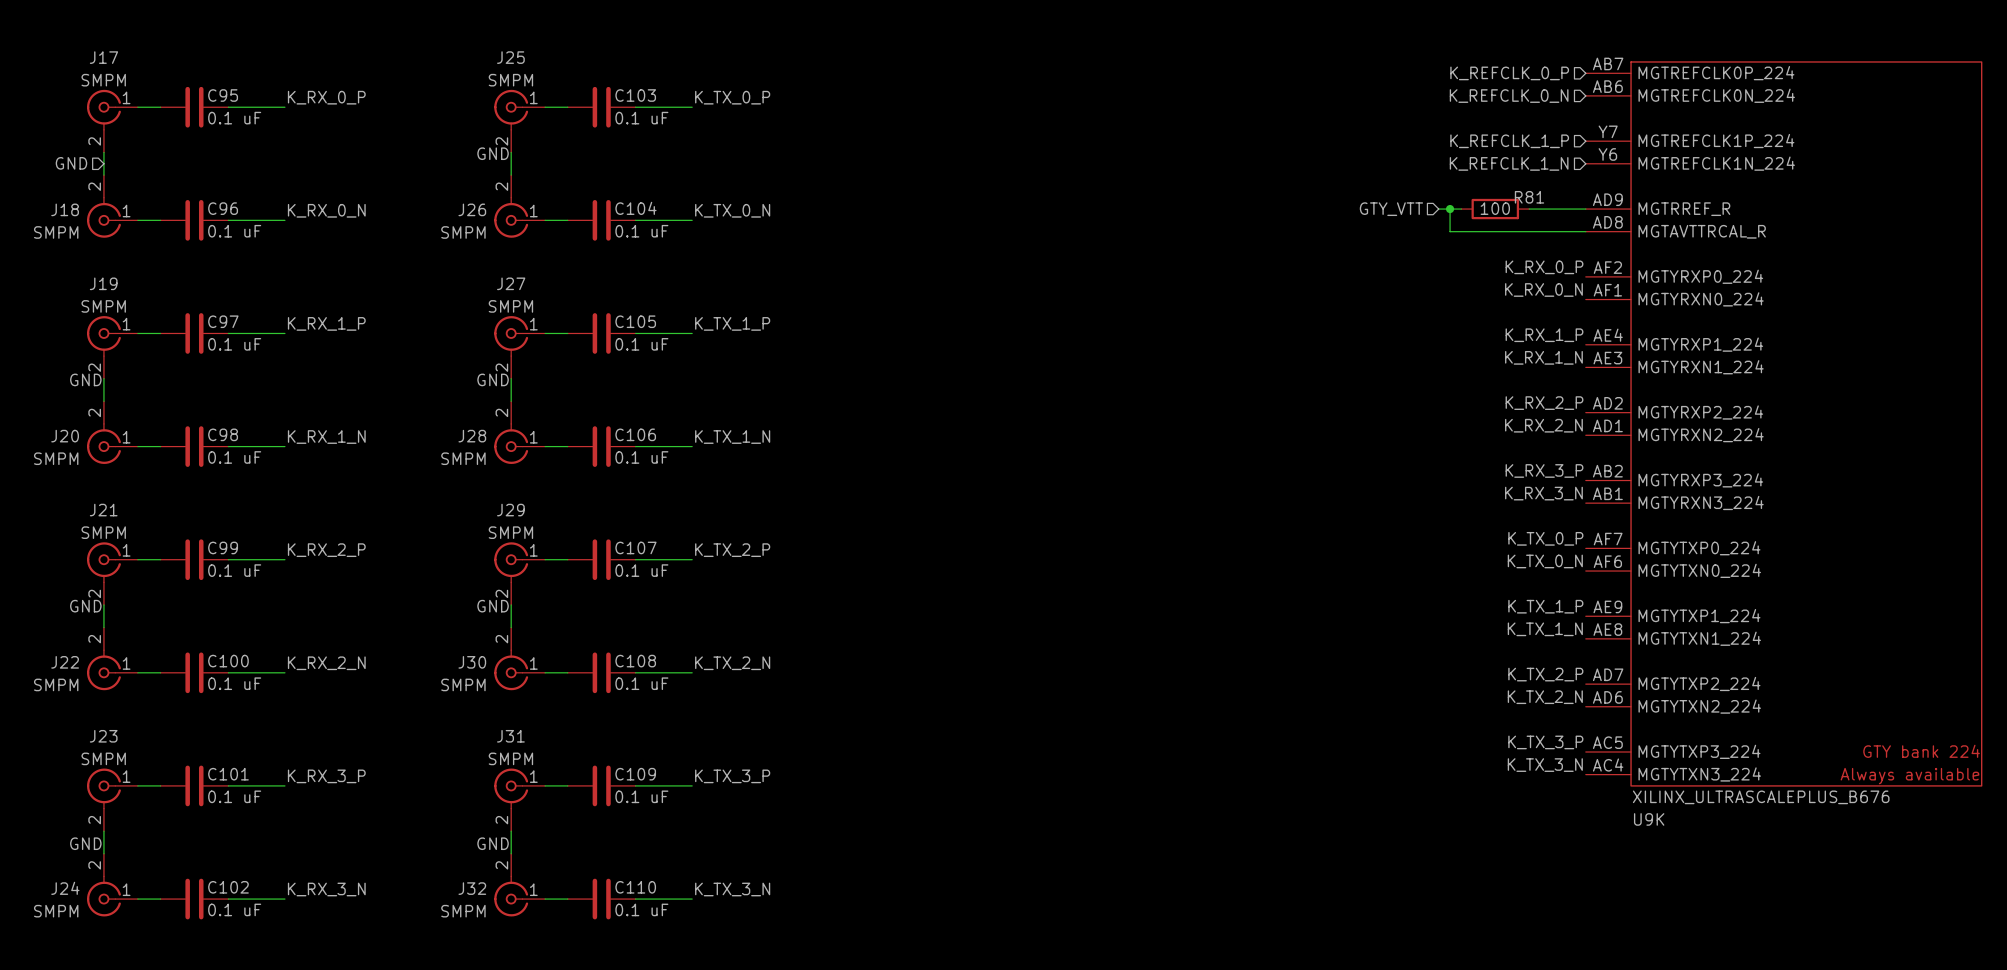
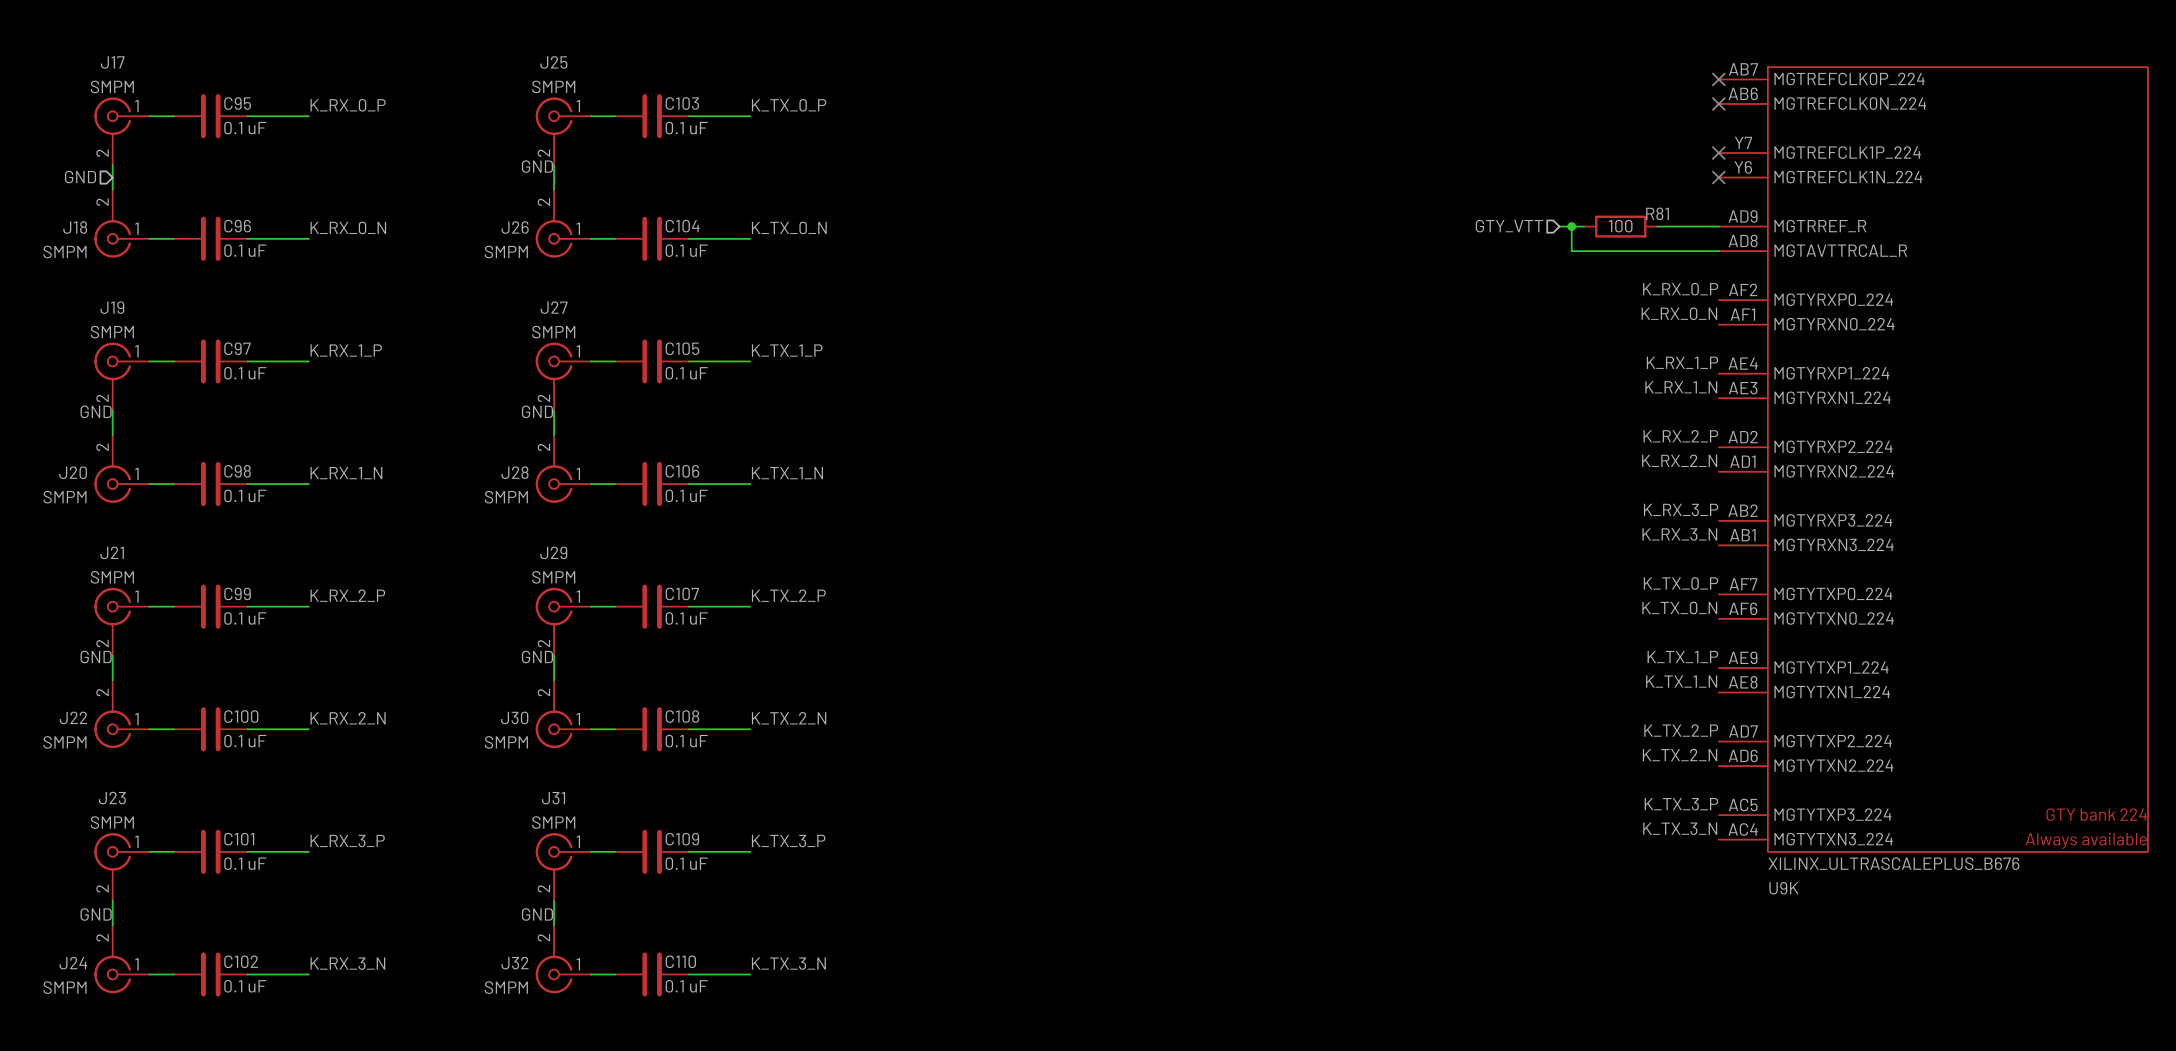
hierarchical label: K_REFCLK_0_P (1509, 73) -> none
no-connect mark: none -> (1718, 79)
no-connect mark: none -> (1718, 103)
hierarchical label: K_REFCLK_0_N (1509, 96) -> none
hierarchical label: K_REFCLK_1_P (1509, 141) -> none
no-connect mark: none -> (1718, 153)
hierarchical label: K_REFCLK_1_N (1509, 163) -> none
no-connect mark: none -> (1718, 177)

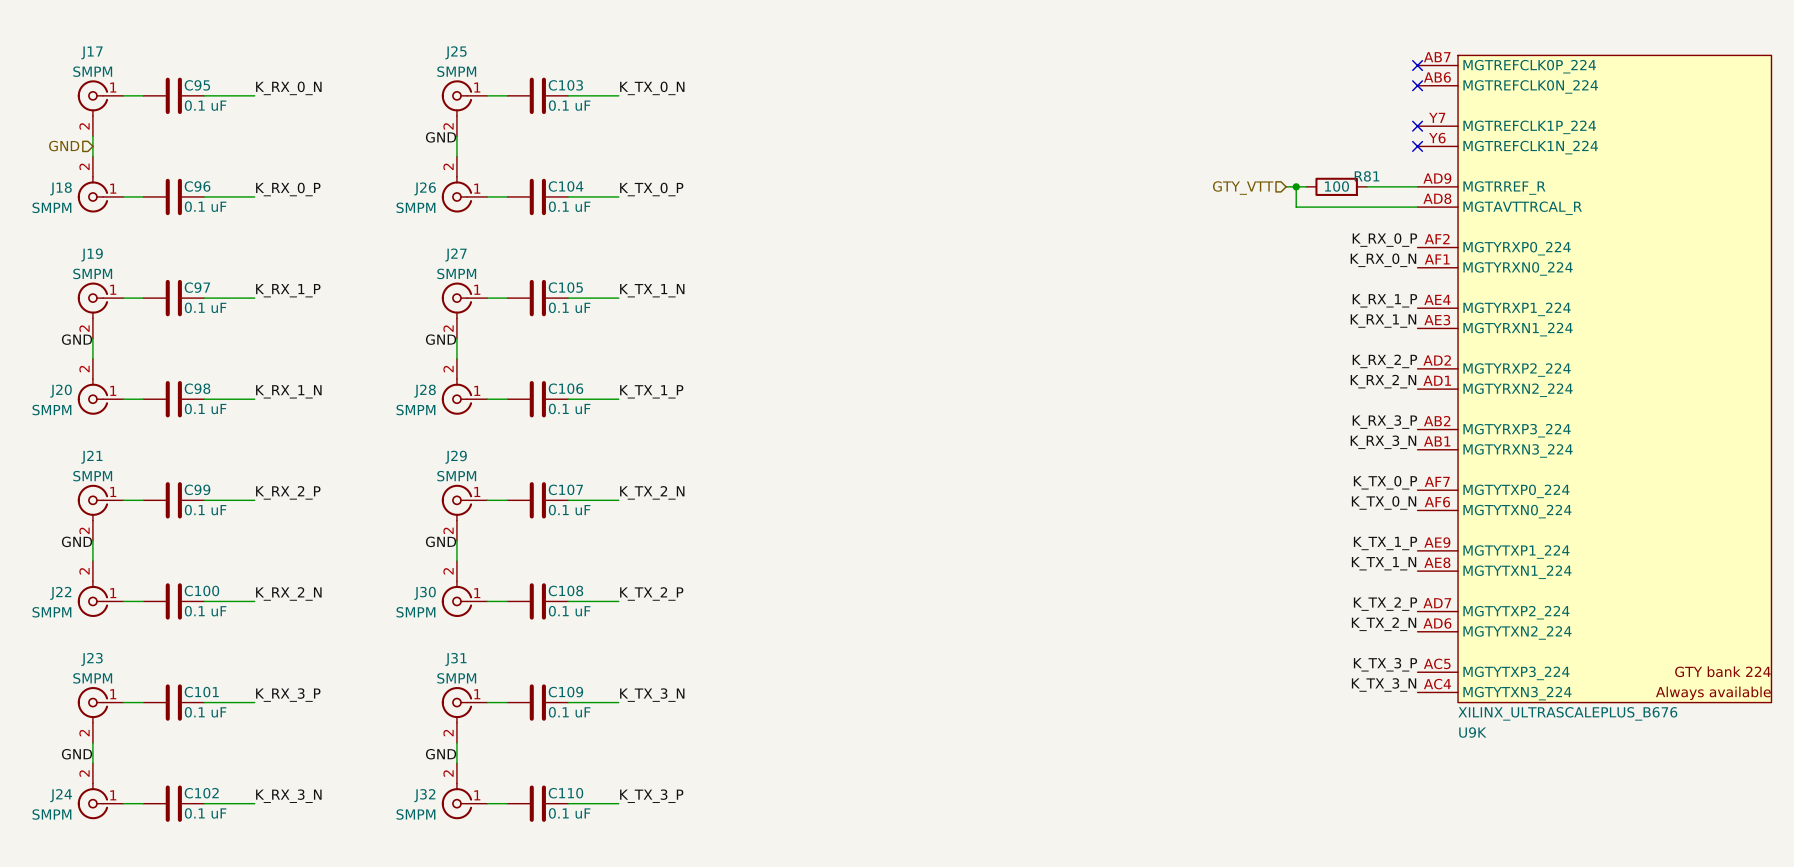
label: K_RX_0_P (348, 105) -> K_RX_0_N (288, 88)
label: K_TX_0_P (789, 105) -> K_TX_0_N (652, 88)
label: K_RX_0_N (348, 227) -> K_RX_0_P (288, 189)
label: K_TX_0_N (789, 227) -> K_TX_0_P (651, 189)
label: K_TX_1_P (787, 350) -> K_TX_1_N (652, 290)
label: K_TX_1_N (787, 473) -> K_TX_1_P (651, 391)
label: K_TX_2_P (788, 595) -> K_TX_2_N (652, 492)
label: K_TX_2_N (789, 718) -> K_TX_2_P (651, 593)
label: K_TX_3_P (788, 841) -> K_TX_3_N (652, 695)
label: K_TX_3_N (788, 963) -> K_TX_3_P (651, 796)

